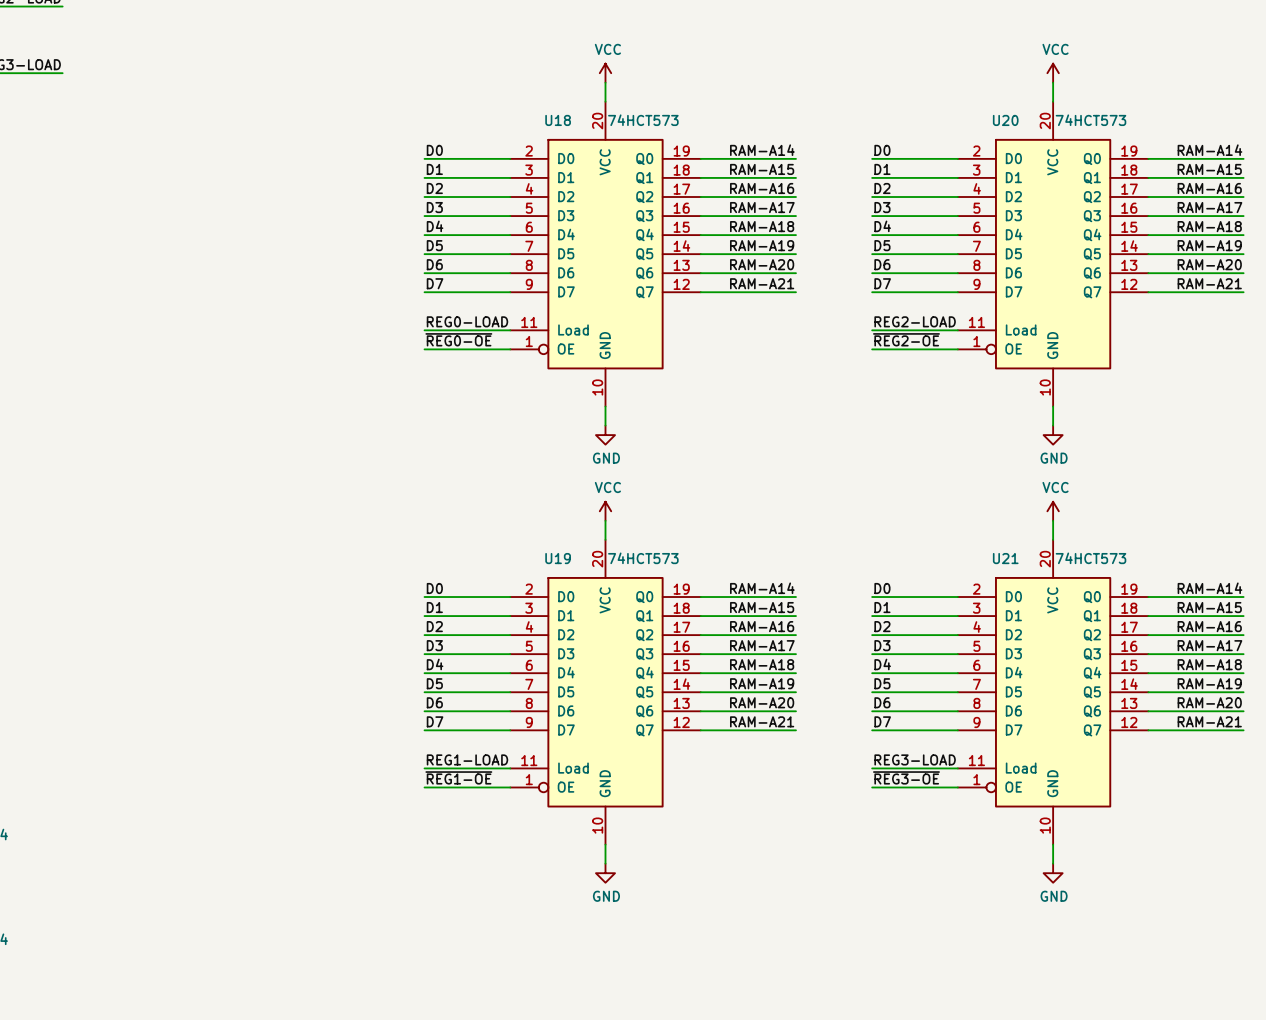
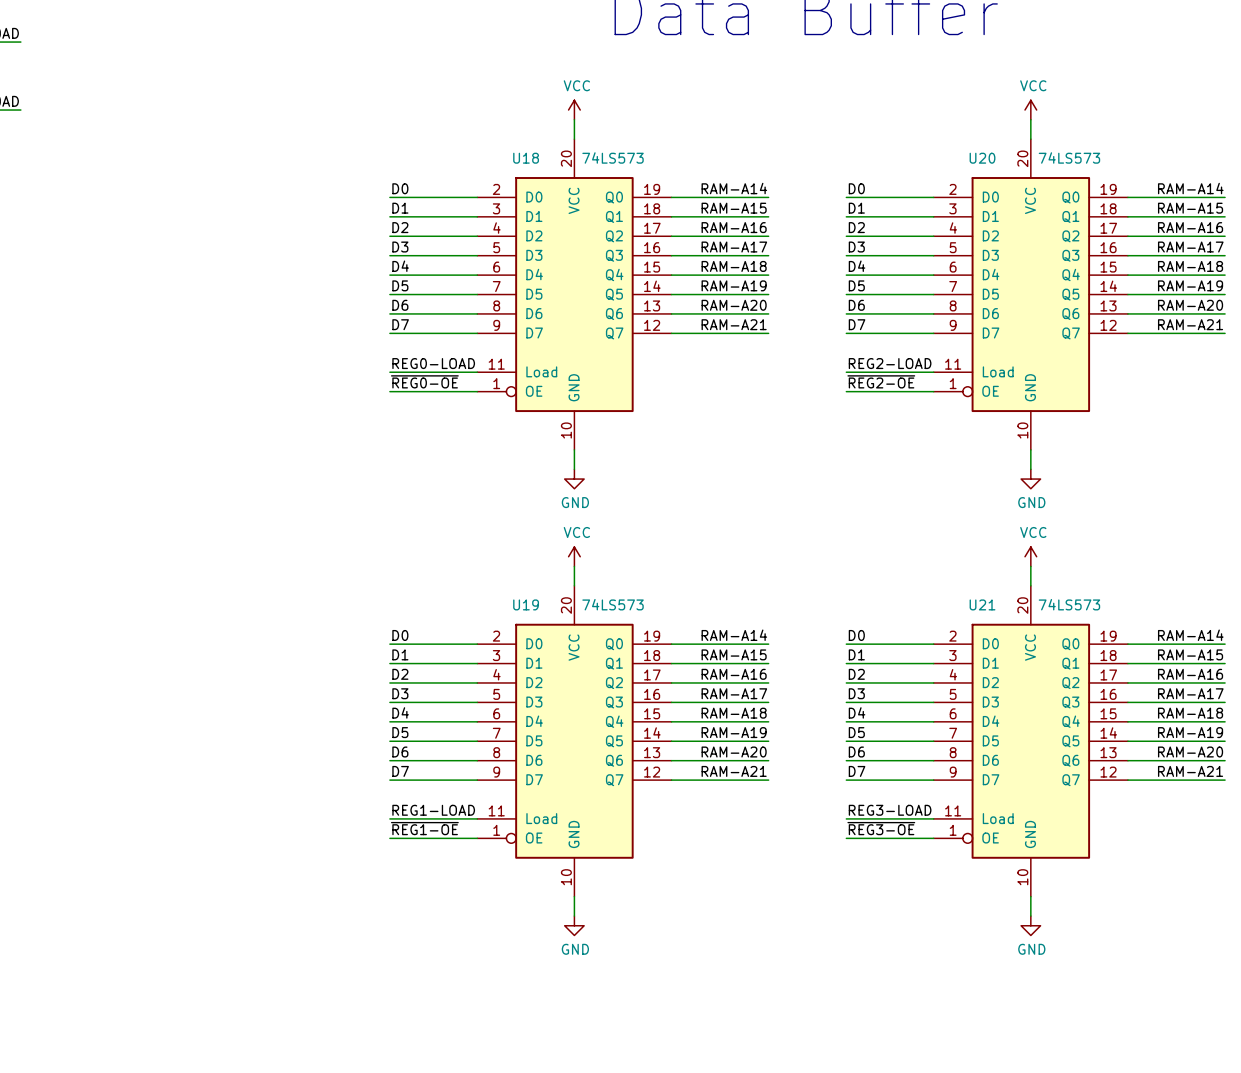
U18 value: 74HCT573 (643, 120) -> 74LS573 (613, 157)
U20 value: 74HCT573 (1090, 120) -> 74LS573 (1069, 157)
U19 value: 74HCT573 (643, 558) -> 74LS573 (613, 604)
U21 value: 74HCT573 (1090, 558) -> 74LS573 (1069, 604)

